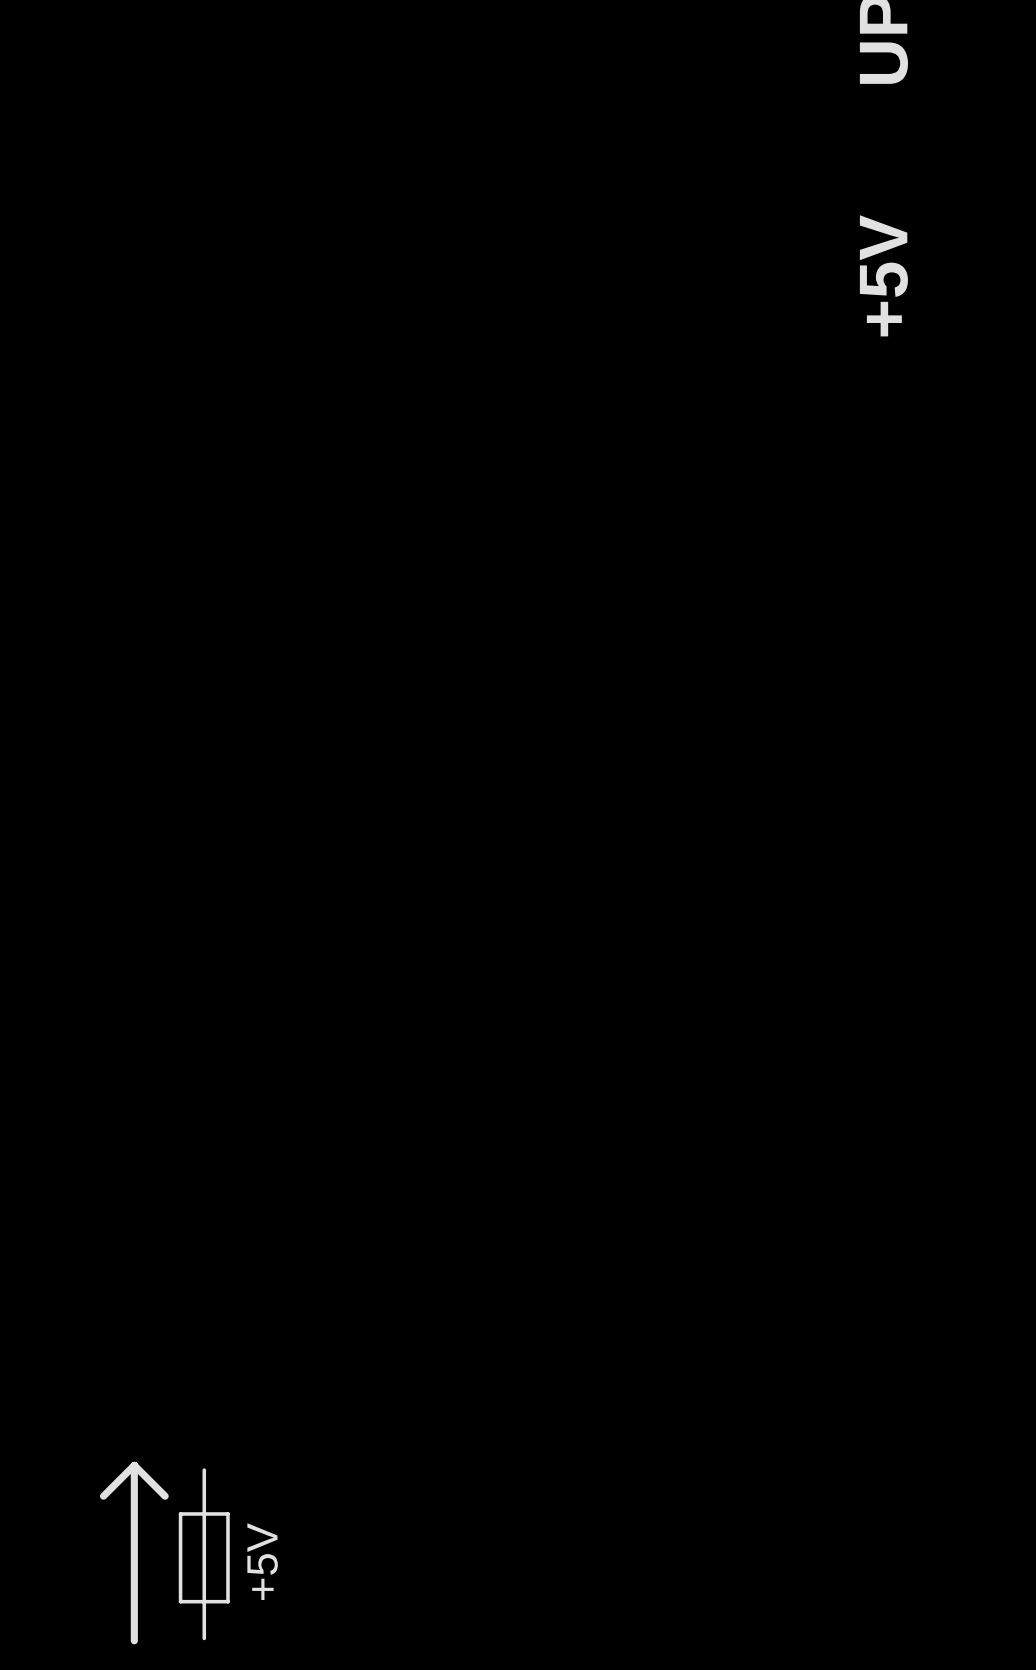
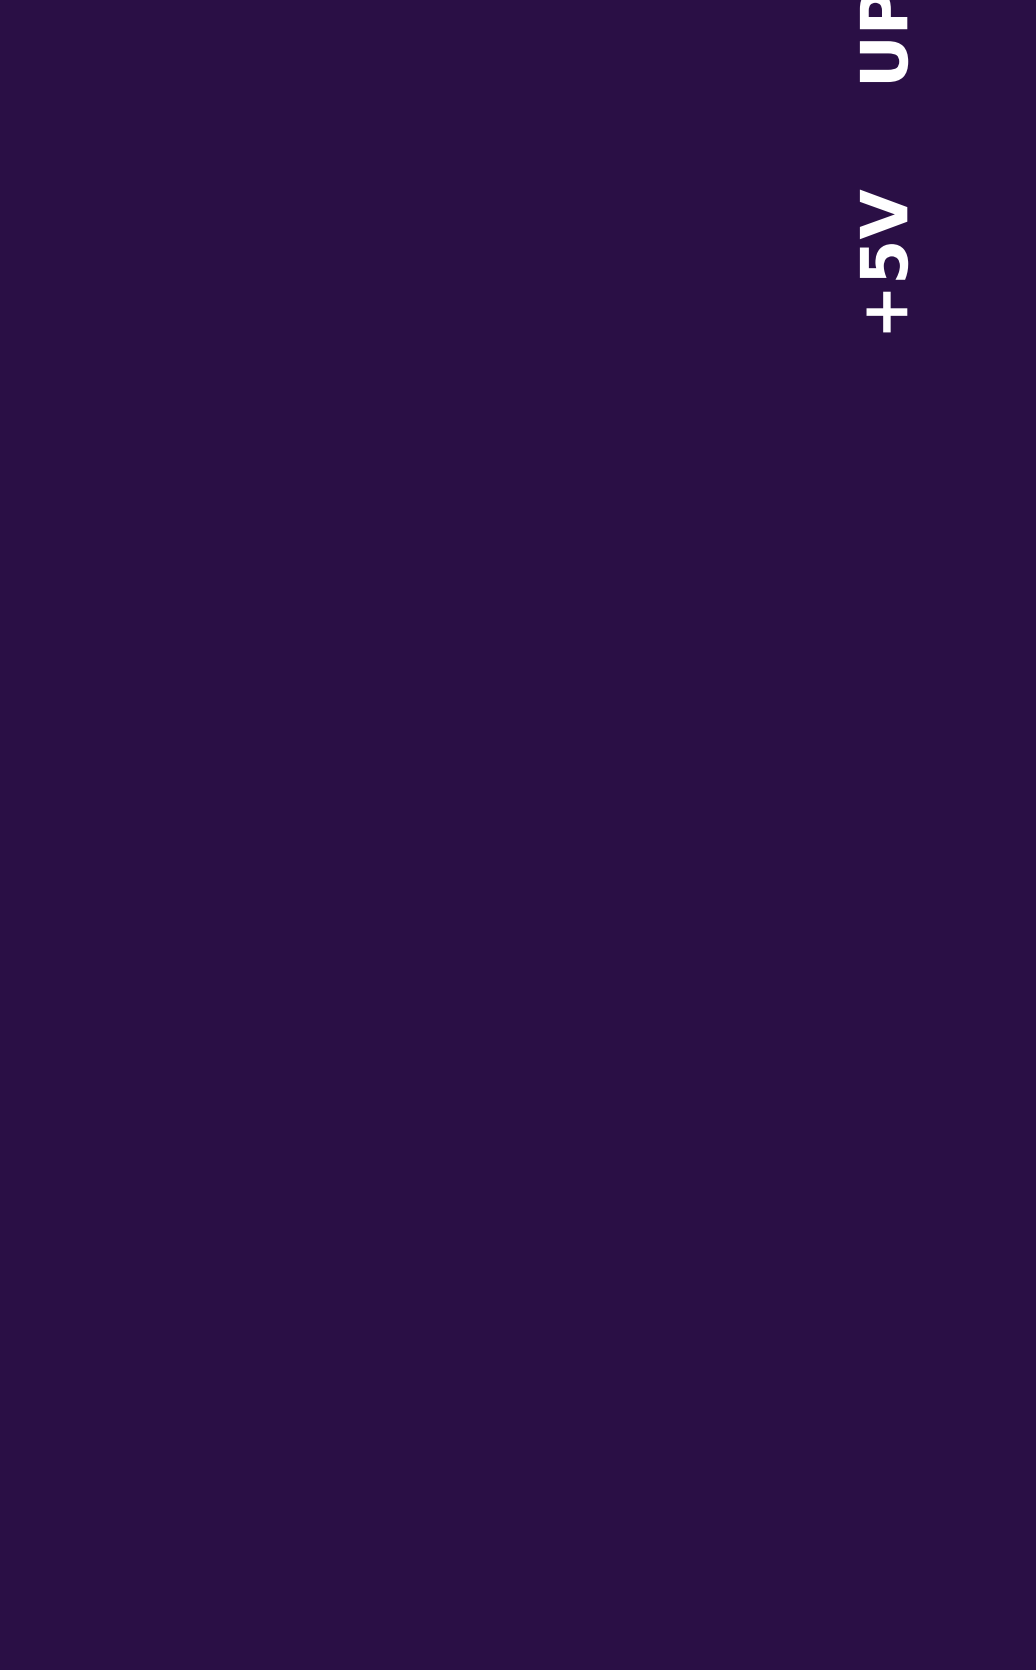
line: (134, 1465) (134, 1640) -> none
line: (134, 1465) (103, 1496) -> none
line: (134, 1465) (165, 1496) -> none
line: (204, 1470) (204, 1638) -> none
line: (180, 1513) (227, 1513) (227, 1601) (180, 1601) (180, 1513) -> none
text: +5V (262, 1561) -> none

